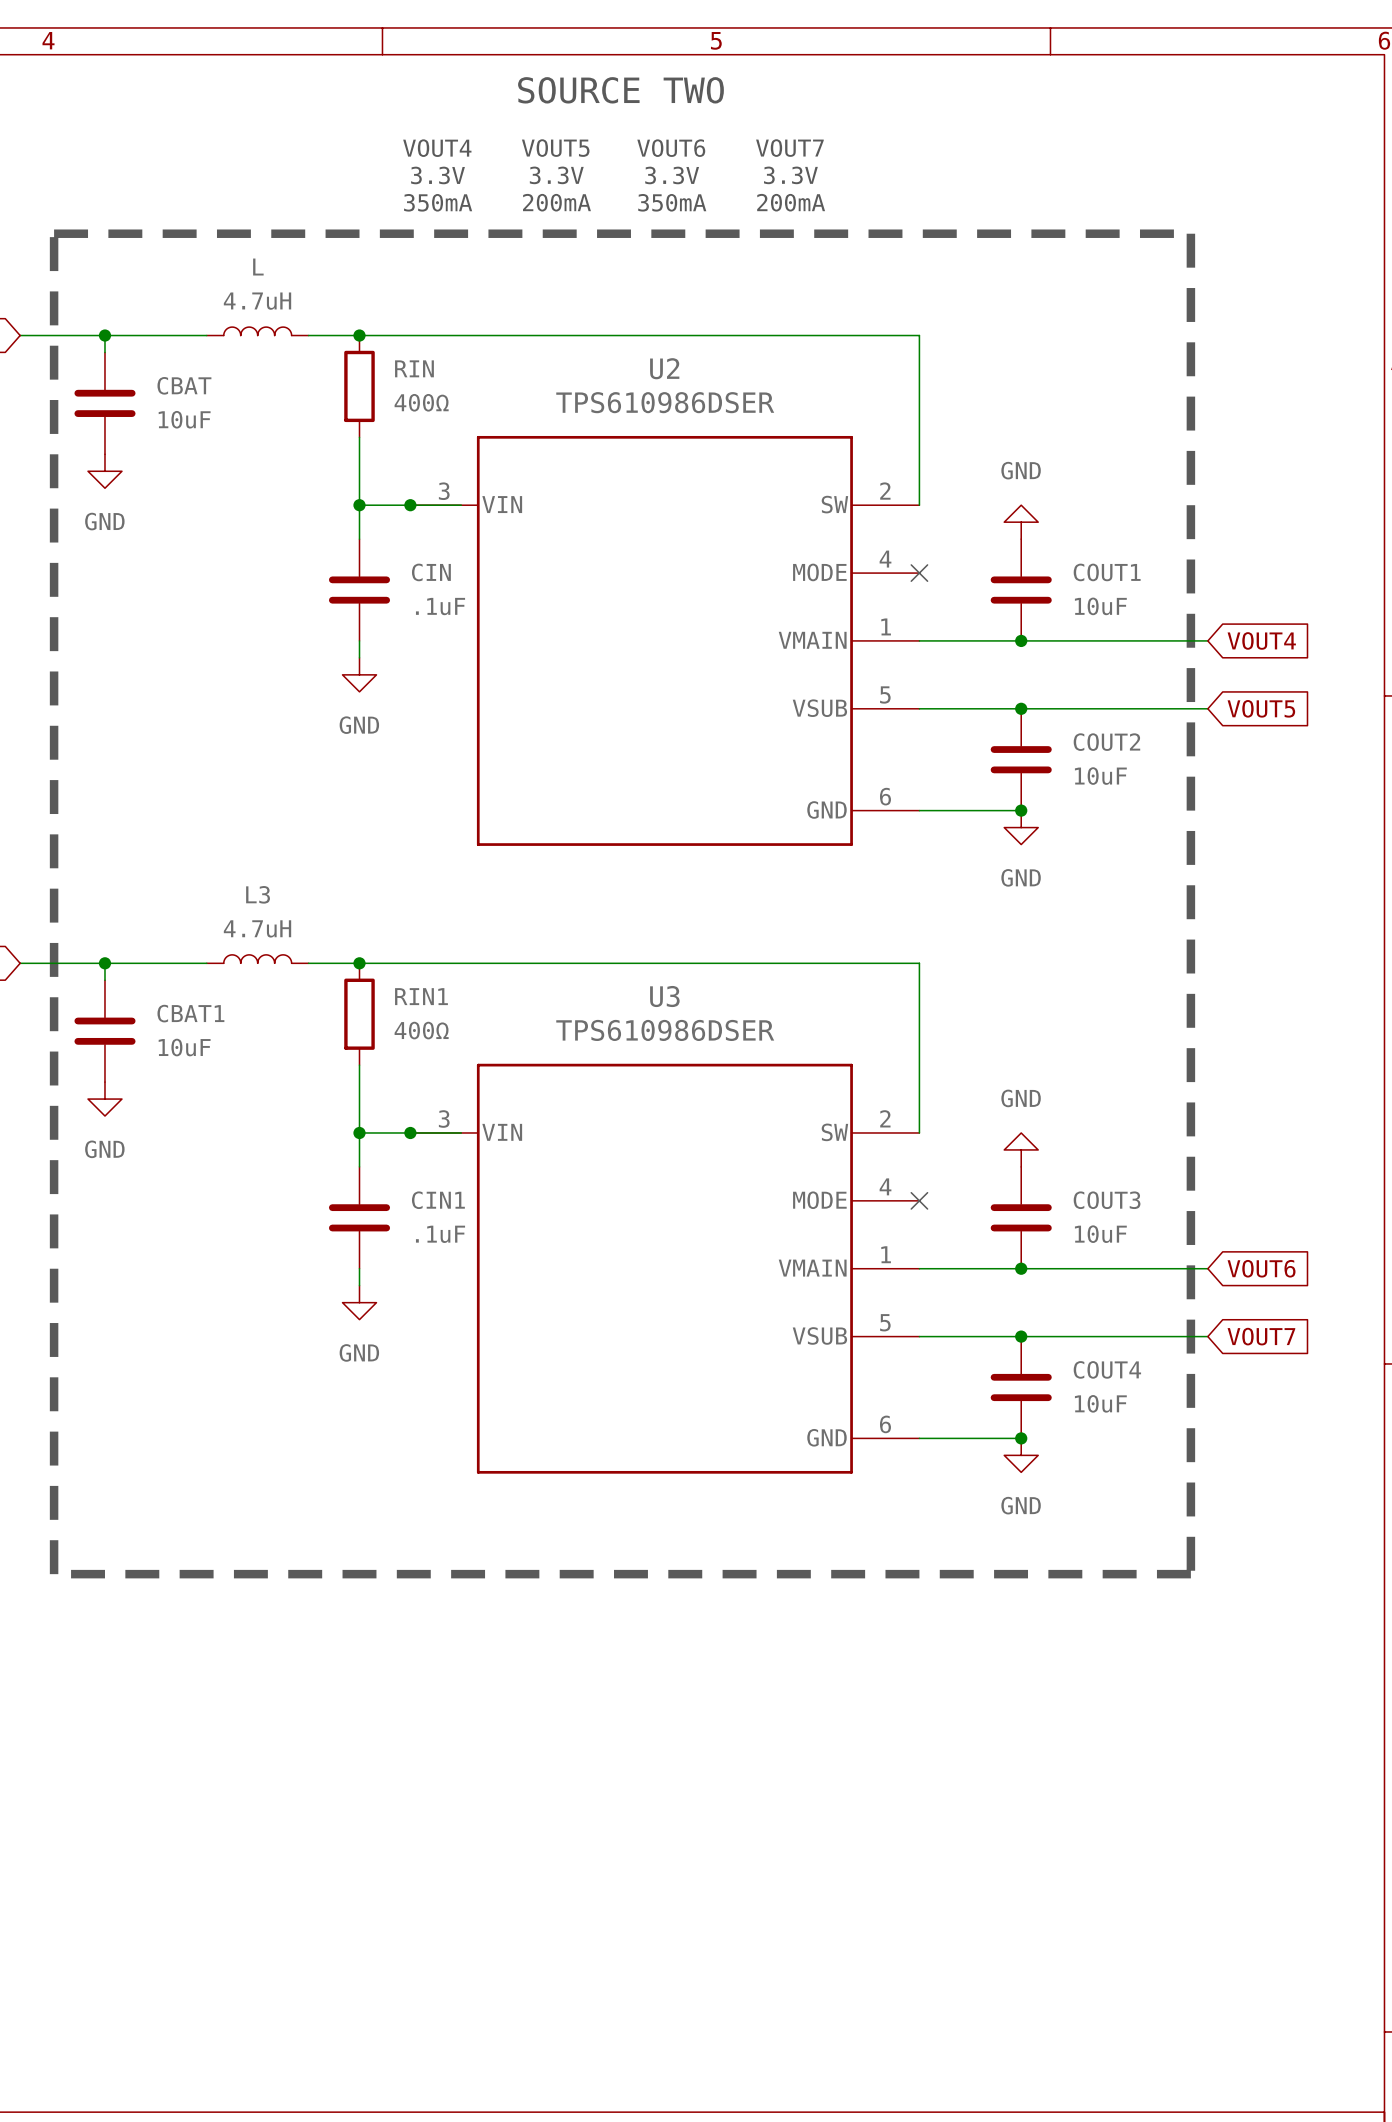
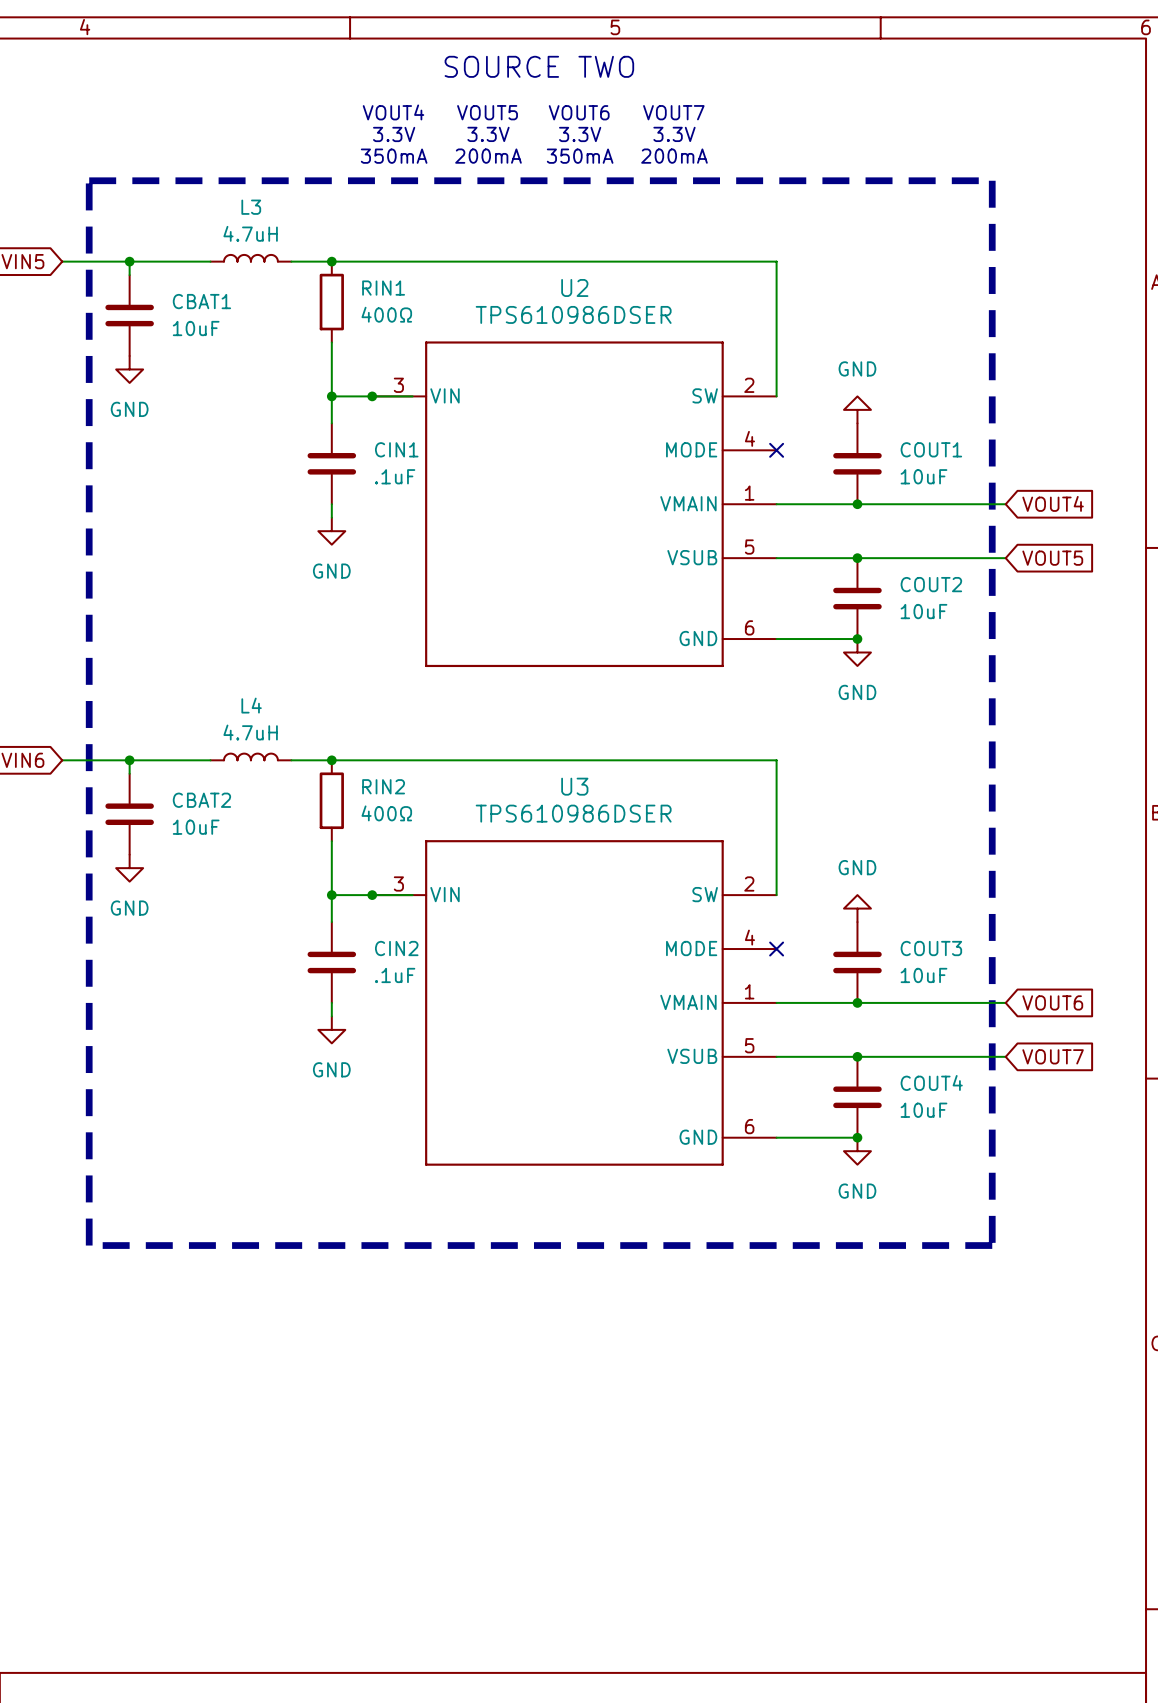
L name: L (258, 267) -> L3 (251, 207)
RIN name: RIN (414, 368) -> RIN1 (383, 288)
CBAT name: CBAT (184, 385) -> CBAT1 (201, 301)
CIN name: CIN (431, 572) -> CIN1 (396, 449)
L3 name: L3 (258, 894) -> L4 (251, 705)
RIN1 name: RIN1 (421, 996) -> RIN2 (383, 786)
CBAT1 name: CBAT1 (190, 1013) -> CBAT2 (201, 800)
CIN1 name: CIN1 (438, 1200) -> CIN2 (396, 948)

